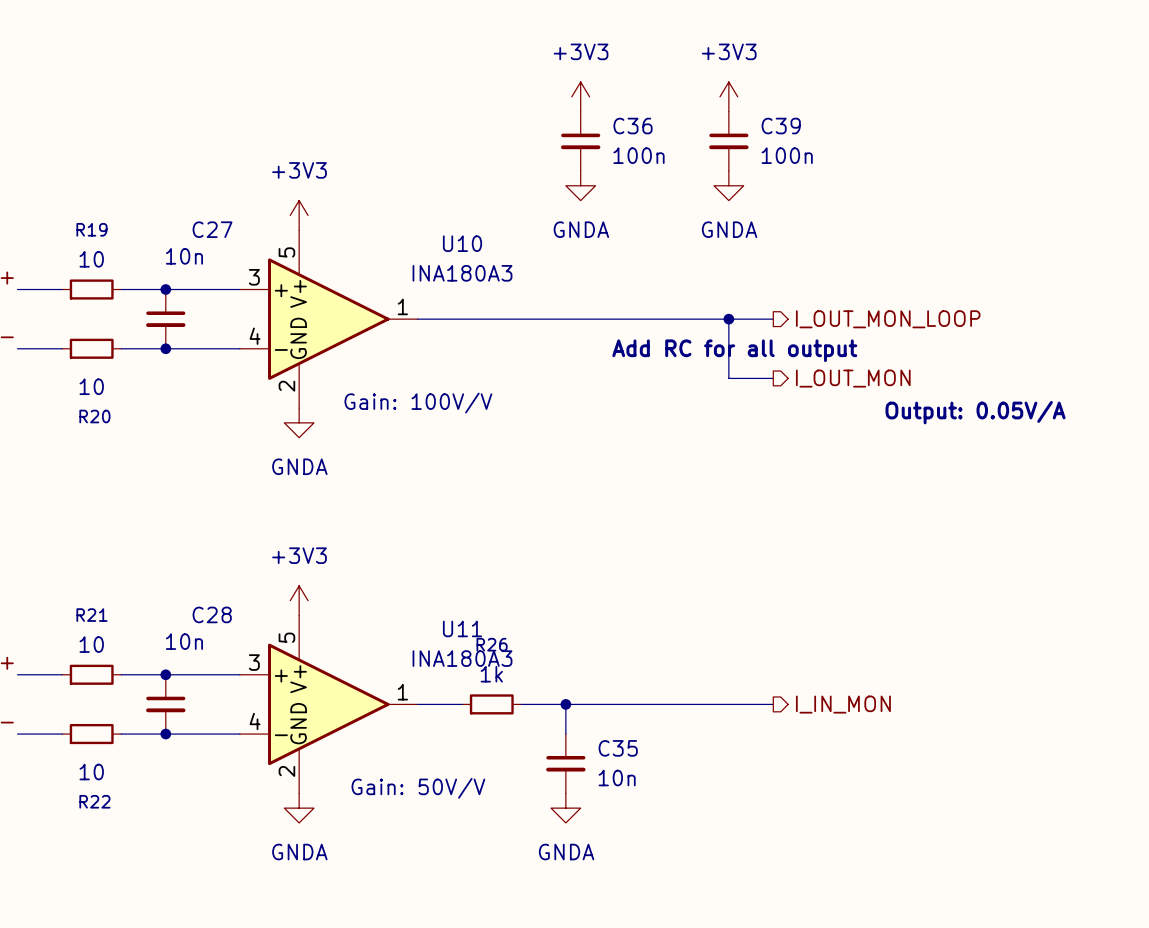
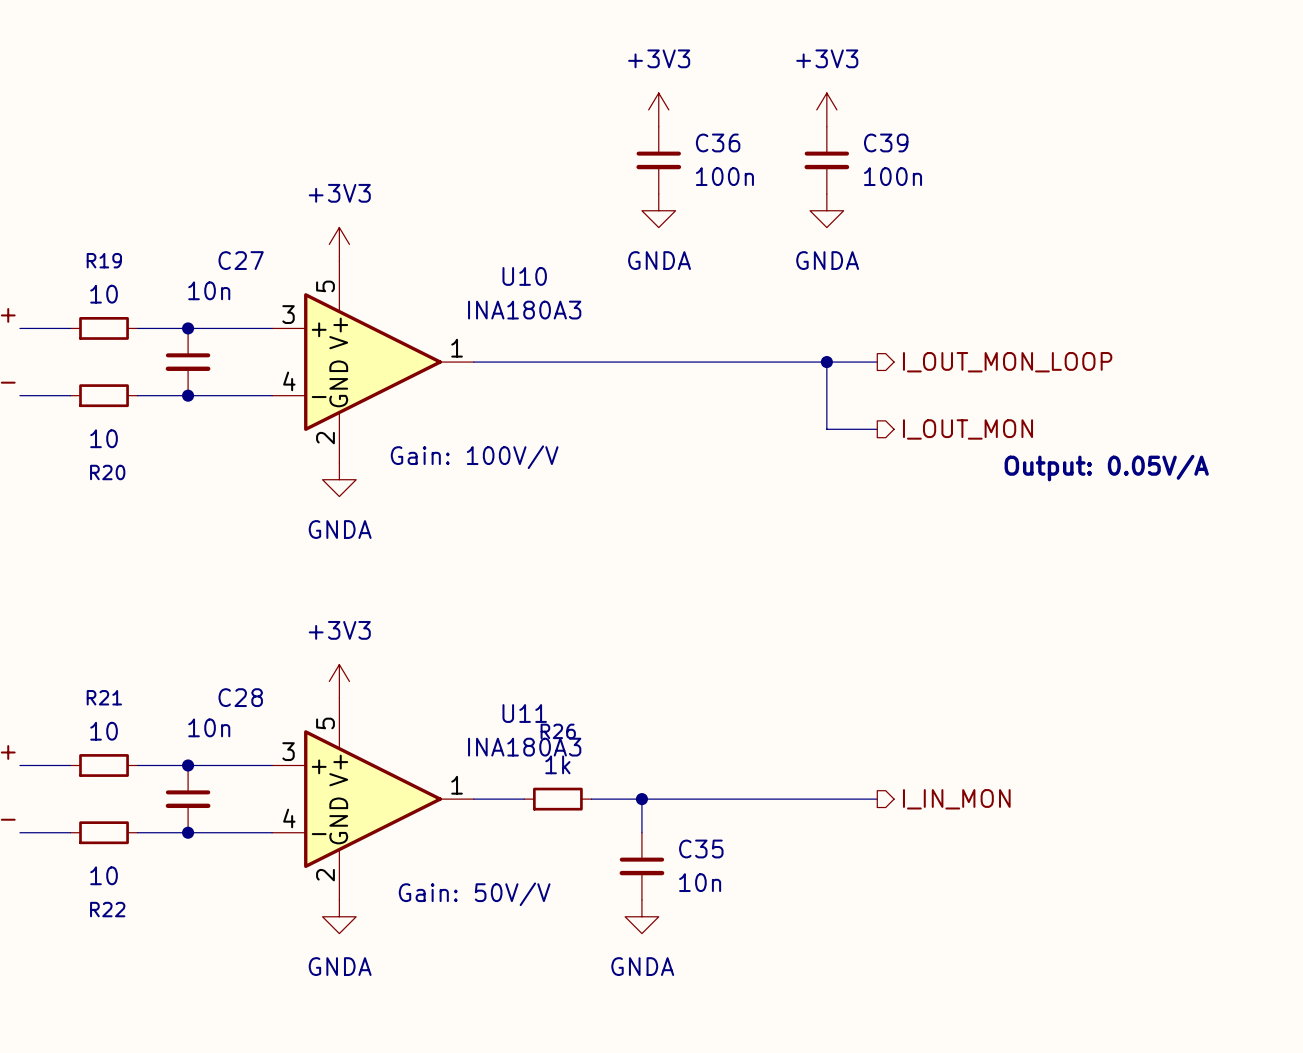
text: Add RC for all output (734, 350) -> none

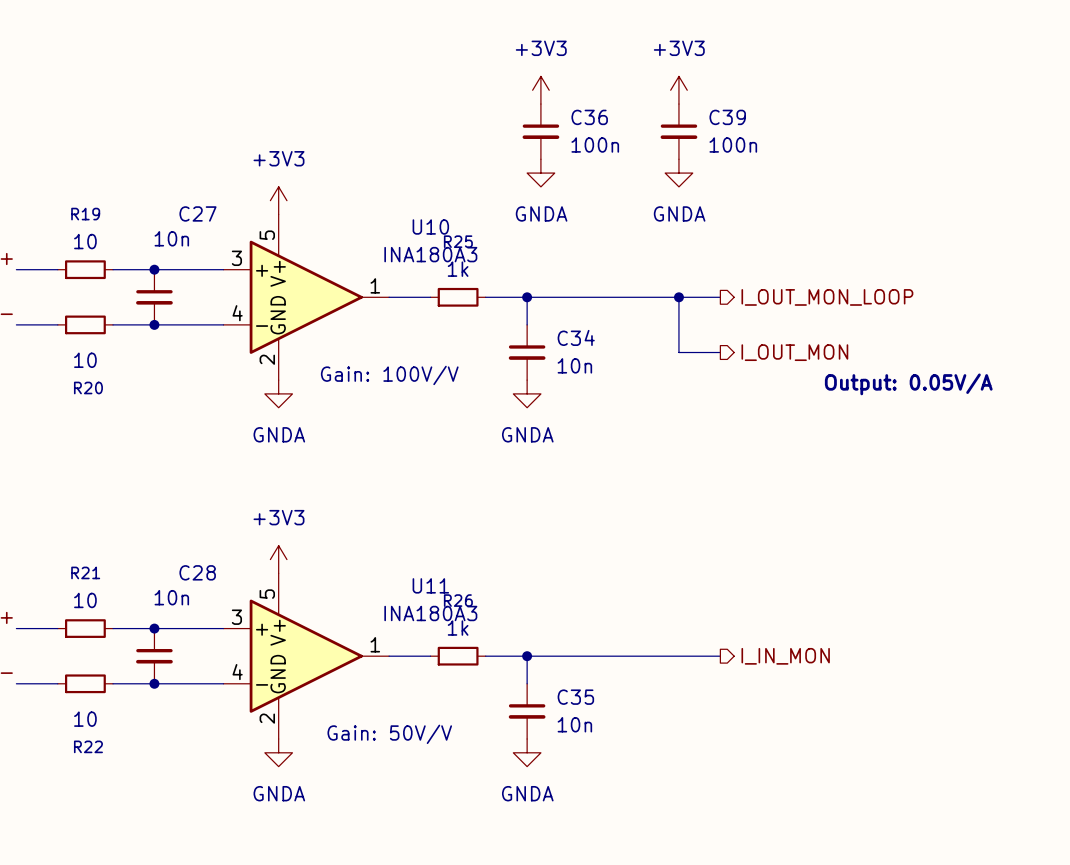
wire: (524, 362) (591, 362) -> none
R25: none -> 1k (458, 297)
wire: none -> (527, 297) (527, 324)
junction: none -> (527, 297)
C34: none -> 10n (527, 352)
power symbol: none -> GNDA (527, 393)

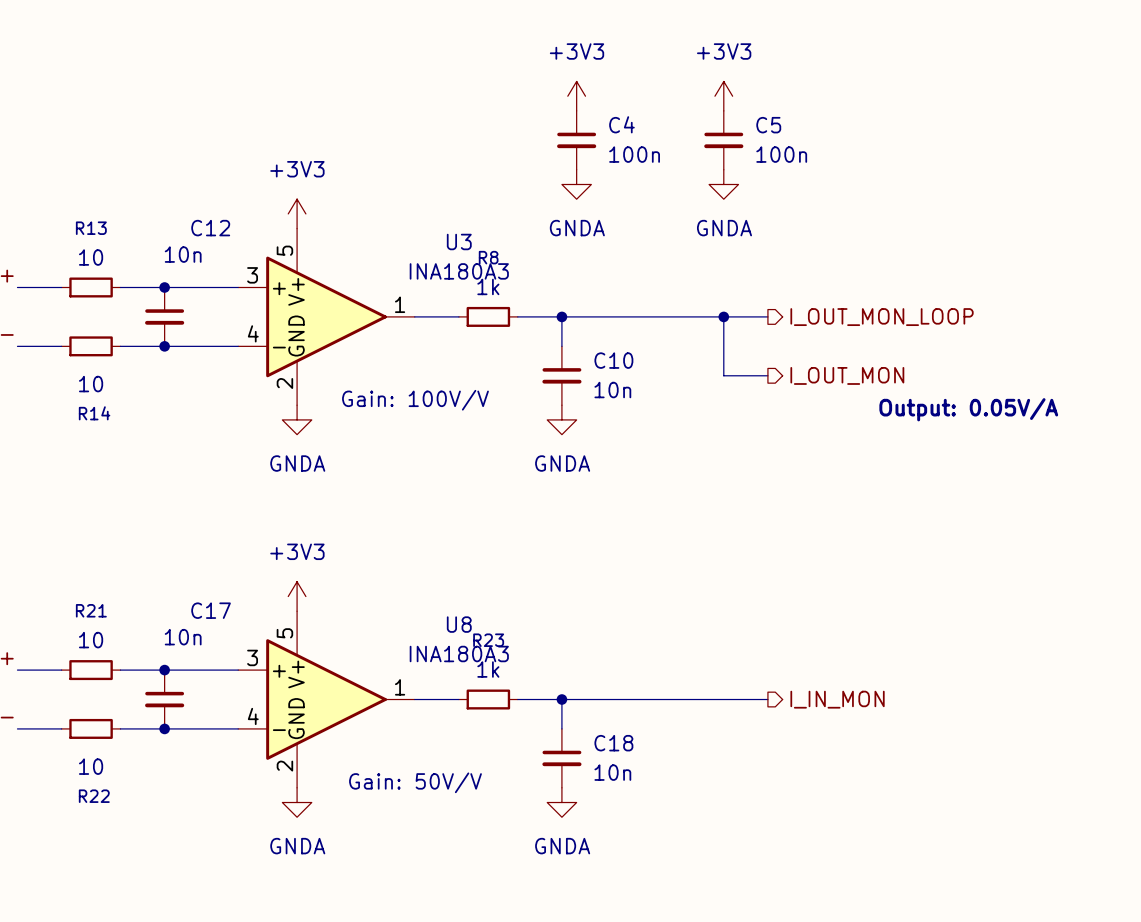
C36 name: C36 (589, 117) -> C4 (621, 124)
C39 name: C39 (727, 117) -> C5 (768, 125)
C27 name: C27 (197, 213) -> C12 (210, 228)
R19 name: R19 (85, 214) -> R13 (91, 228)
U10 name: U10 (430, 227) -> U3 (459, 241)
R25 name: R25 (458, 241) -> R8 (488, 257)
C34 name: C34 (576, 337) -> C10 (613, 360)
R20 name: R20 (88, 387) -> R14 (94, 413)
C28 name: C28 (197, 572) -> C17 (211, 610)
U11 name: U11 (430, 585) -> U8 (459, 624)
R26 name: R26 (458, 600) -> R23 (488, 640)
C35 name: C35 (575, 697) -> C18 (613, 743)

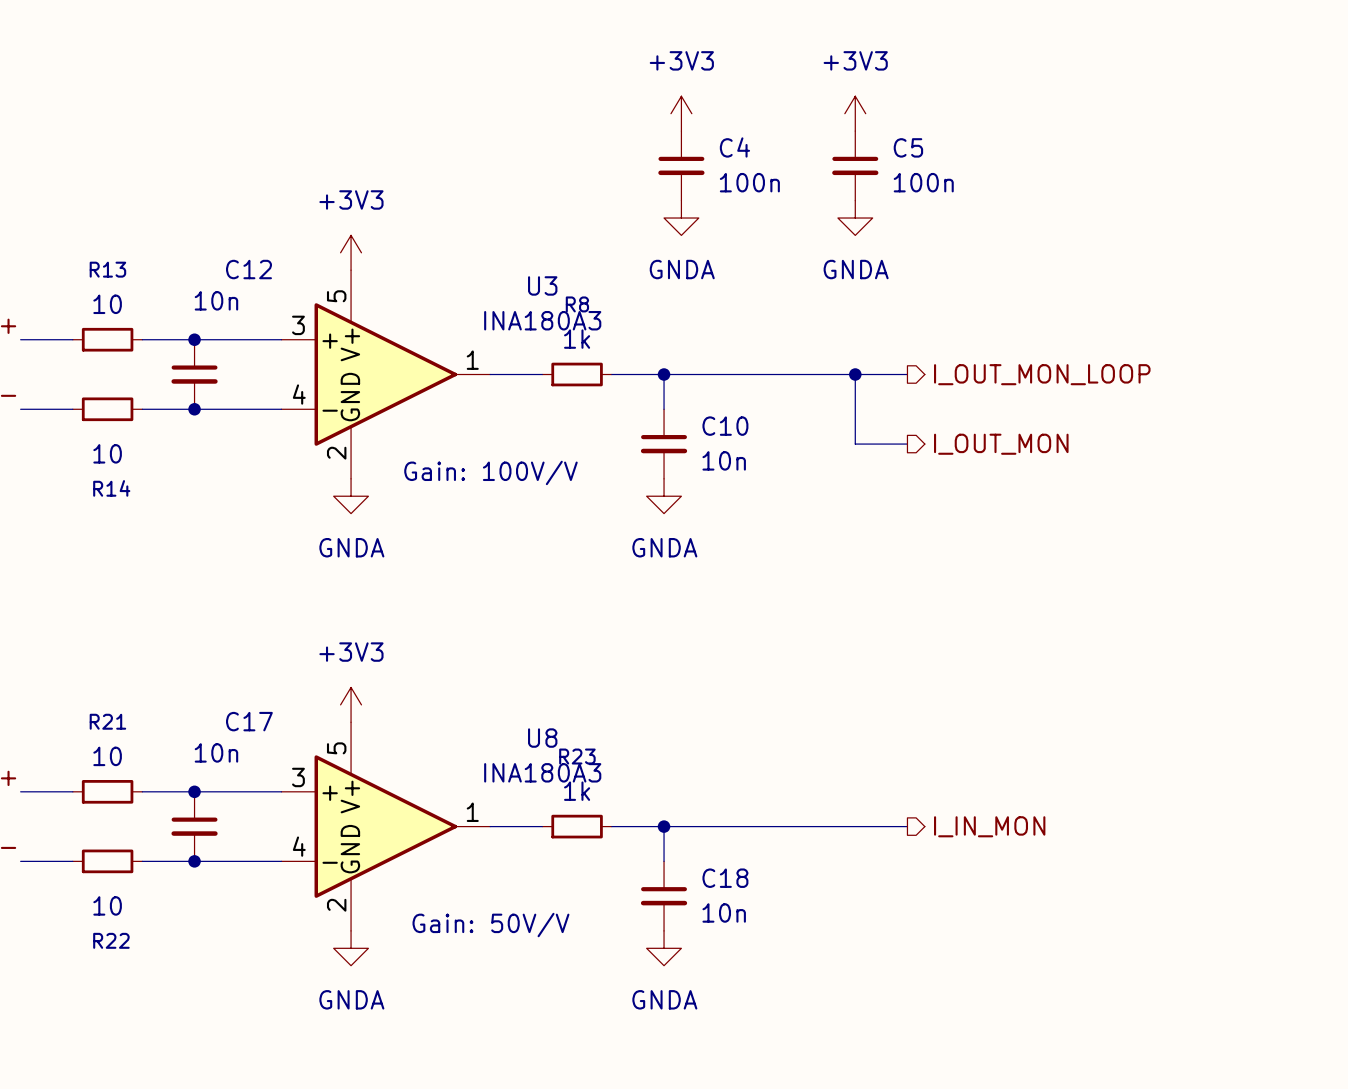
text: Output: 0.05V/A (968, 409) -> none

